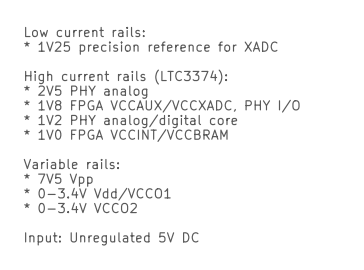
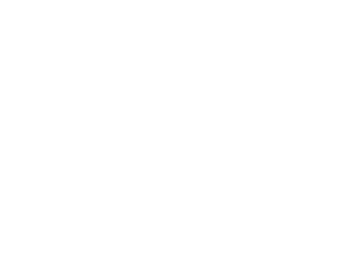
text: Low current rails: (84, 31) -> none
text: * 1V25 precision reference for XADC (150, 48) -> none
text: High current rails (LTC3374): (126, 77) -> none
text: * 2V5 PHY analog (85, 92) -> none
text: * 1V8 FPGA VCCAUX/VCCXADC, PHY I/O (161, 106) -> none
text: * 1V2 PHY analog/digital core (130, 121) -> none
text: * 1V0 FPGA VCCINT/VCCBRAM (125, 135) -> none
text: Variable rails: (71, 164) -> none
text: * 7V5 Vpp (58, 180) -> none
text: * 0-3.4V Vdd/VCCO1 (97, 194) -> none
text: * 0-3.4V VCCO2 (80, 207) -> none
text: Input: Unregulated 5V DC (111, 238) -> none

